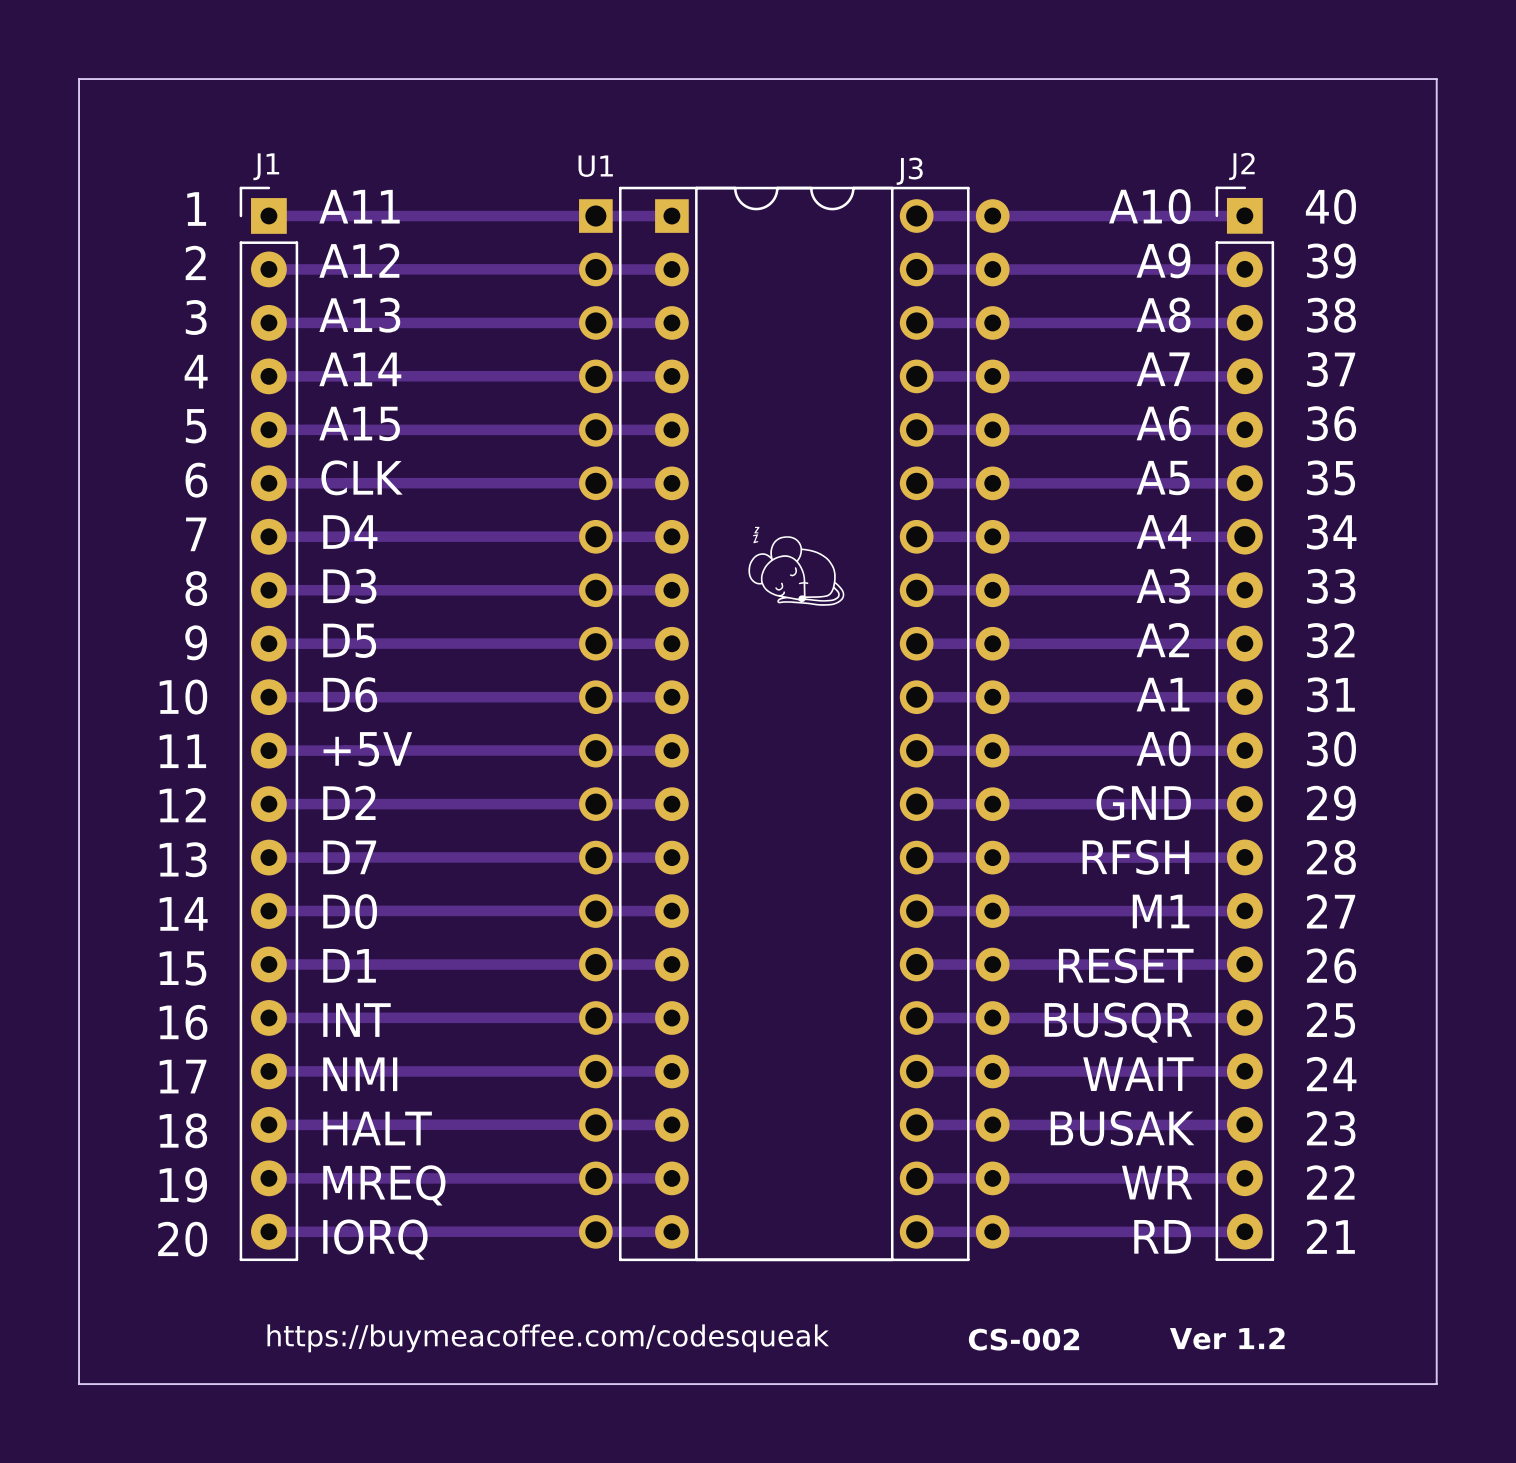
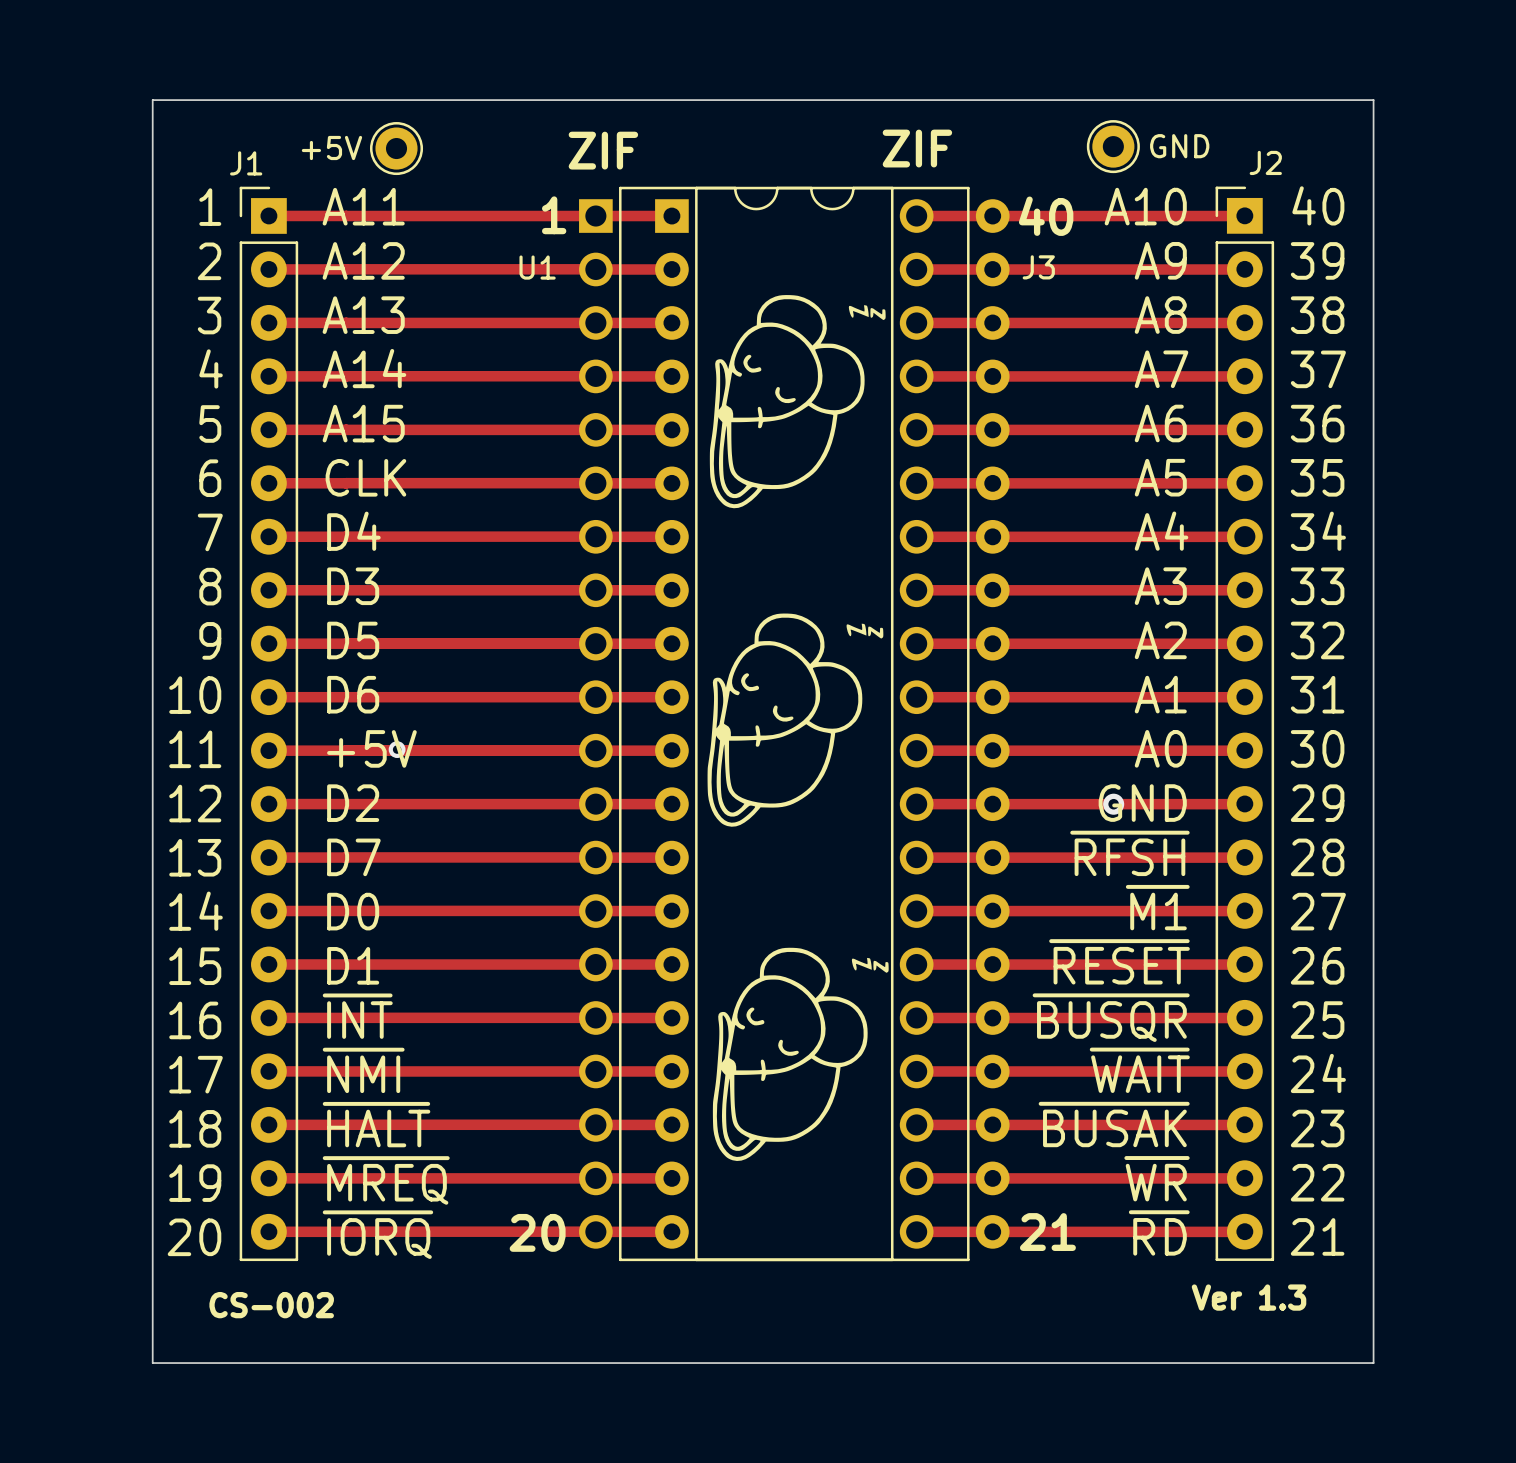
board edge: (79, 79) (79, 1384) (1436, 1384) (1436, 79) (79, 79) -> (152, 100) (152, 1363) (1373, 1363) (1373, 100) (152, 100)
part: none -> GND (1113, 146)
part: none -> +5V (396, 148)
text: none -> ZIF (917, 148)
text: none -> ZIF (603, 150)
J1 name position: J1 (266, 166) -> J1 (246, 163)
U1 name position: U1 (595, 166) -> U1 (537, 267)
J2 name position: J2 (1241, 166) -> J2 (1265, 162)
J3 name position: J3 (909, 171) -> J3 (1038, 267)
text position: 40 (1330, 206) -> 40 (1318, 205)
text position: 1 (196, 209) -> 1 (210, 207)
text: none -> 1 (554, 215)
text: none -> 40 (1046, 216)
text position: 39 (1331, 261) -> 39 (1317, 260)
text position: 2 (195, 262) -> 2 (209, 261)
drawing: none -> [709, 295, 886, 509]
text position: 38 (1331, 315) -> 38 (1317, 315)
text position: 3 (196, 317) -> 3 (209, 315)
text position: 37 (1331, 369) -> 37 (1318, 369)
text position: 4 (196, 371) -> 4 (211, 368)
text position: 36 (1331, 423) -> 36 (1317, 423)
text position: 5 (196, 426) -> 5 (210, 423)
text position: 35 (1331, 477) -> 35 (1317, 477)
text position: 6 (196, 480) -> 6 (210, 478)
drawing: [748, 526, 845, 606] -> none
text position: 34 (1331, 532) -> 34 (1318, 531)
text position: 7 (196, 534) -> 7 (210, 532)
text position: 33 (1331, 586) -> 33 (1317, 586)
text position: 8 (196, 588) -> 8 (210, 586)
drawing: none -> [707, 613, 884, 827]
text position: 32 (1330, 640) -> 32 (1317, 640)
text position: 9 (196, 642) -> 9 (210, 640)
text position: 31 (1330, 694) -> 31 (1317, 694)
text position: 10 (183, 697) -> 10 (195, 695)
via: none -> (397, 749)
text position: 30 (1331, 749) -> 30 (1317, 748)
text position: 11 (182, 751) -> 11 (195, 749)
text position: 29 (1331, 803) -> 29 (1317, 803)
via: none -> (1113, 804)
text position: 12 (182, 805) -> 12 (195, 803)
text: RFSH (1135, 857) -> ~{RFSH} (1129, 853)
text position: 28 (1331, 857) -> 28 (1317, 857)
text position: 13 (183, 859) -> 13 (195, 857)
text: M1 (1161, 911) -> ~{M1} (1157, 907)
text position: 27 (1331, 911) -> 27 (1318, 911)
text position: 14 (183, 913) -> 14 (196, 911)
drawing: none -> [712, 947, 889, 1161]
text: RESET (1126, 965) -> ~{RESET} (1119, 961)
text position: 26 (1331, 965) -> 26 (1317, 965)
text position: 15 (183, 968) -> 15 (195, 966)
text: INT (356, 1020) -> ~{INT} (357, 1016)
text position: 25 (1331, 1020) -> 25 (1317, 1020)
text position: 16 (183, 1022) -> 16 (195, 1020)
text: BUSQR (1118, 1022) -> ~{BUSQR} (1111, 1017)
text: NMI (360, 1074) -> ~{NMI} (363, 1070)
text: WAIT (1138, 1074) -> ~{WAIT} (1139, 1070)
text position: 24 (1331, 1074) -> 24 (1318, 1073)
text position: 17 (183, 1076) -> 17 (196, 1074)
text: HALT (377, 1128) -> ~{HALT} (376, 1124)
text: BUSAK (1122, 1128) -> ~{BUSAK} (1114, 1124)
text position: 23 (1331, 1128) -> 23 (1317, 1128)
text position: 18 (183, 1130) -> 18 (195, 1128)
text: WR (1157, 1182) -> ~{WR} (1157, 1178)
text position: 22 (1330, 1182) -> 22 (1317, 1182)
text position: 19 (183, 1185) -> 19 (195, 1183)
text: MREQ (384, 1185) -> ~{MREQ} (386, 1180)
text: none -> 21 (1047, 1232)
text: none -> 20 (537, 1232)
text: RD (1162, 1236) -> ~{RD} (1159, 1232)
text position: 21 (1330, 1236) -> 21 (1317, 1236)
text position: 20 (182, 1239) -> 20 (194, 1237)
text: IORQ (375, 1239) -> ~{IORQ} (377, 1234)
text: none -> CS-002 (271, 1305)
text: https://buymeacoffee.com/codesqueak (548, 1338) -> none
text: Ver 1.2 (1227, 1338) -> Ver 1.3 (1249, 1297)
text: CS-002 (1023, 1339) -> none

